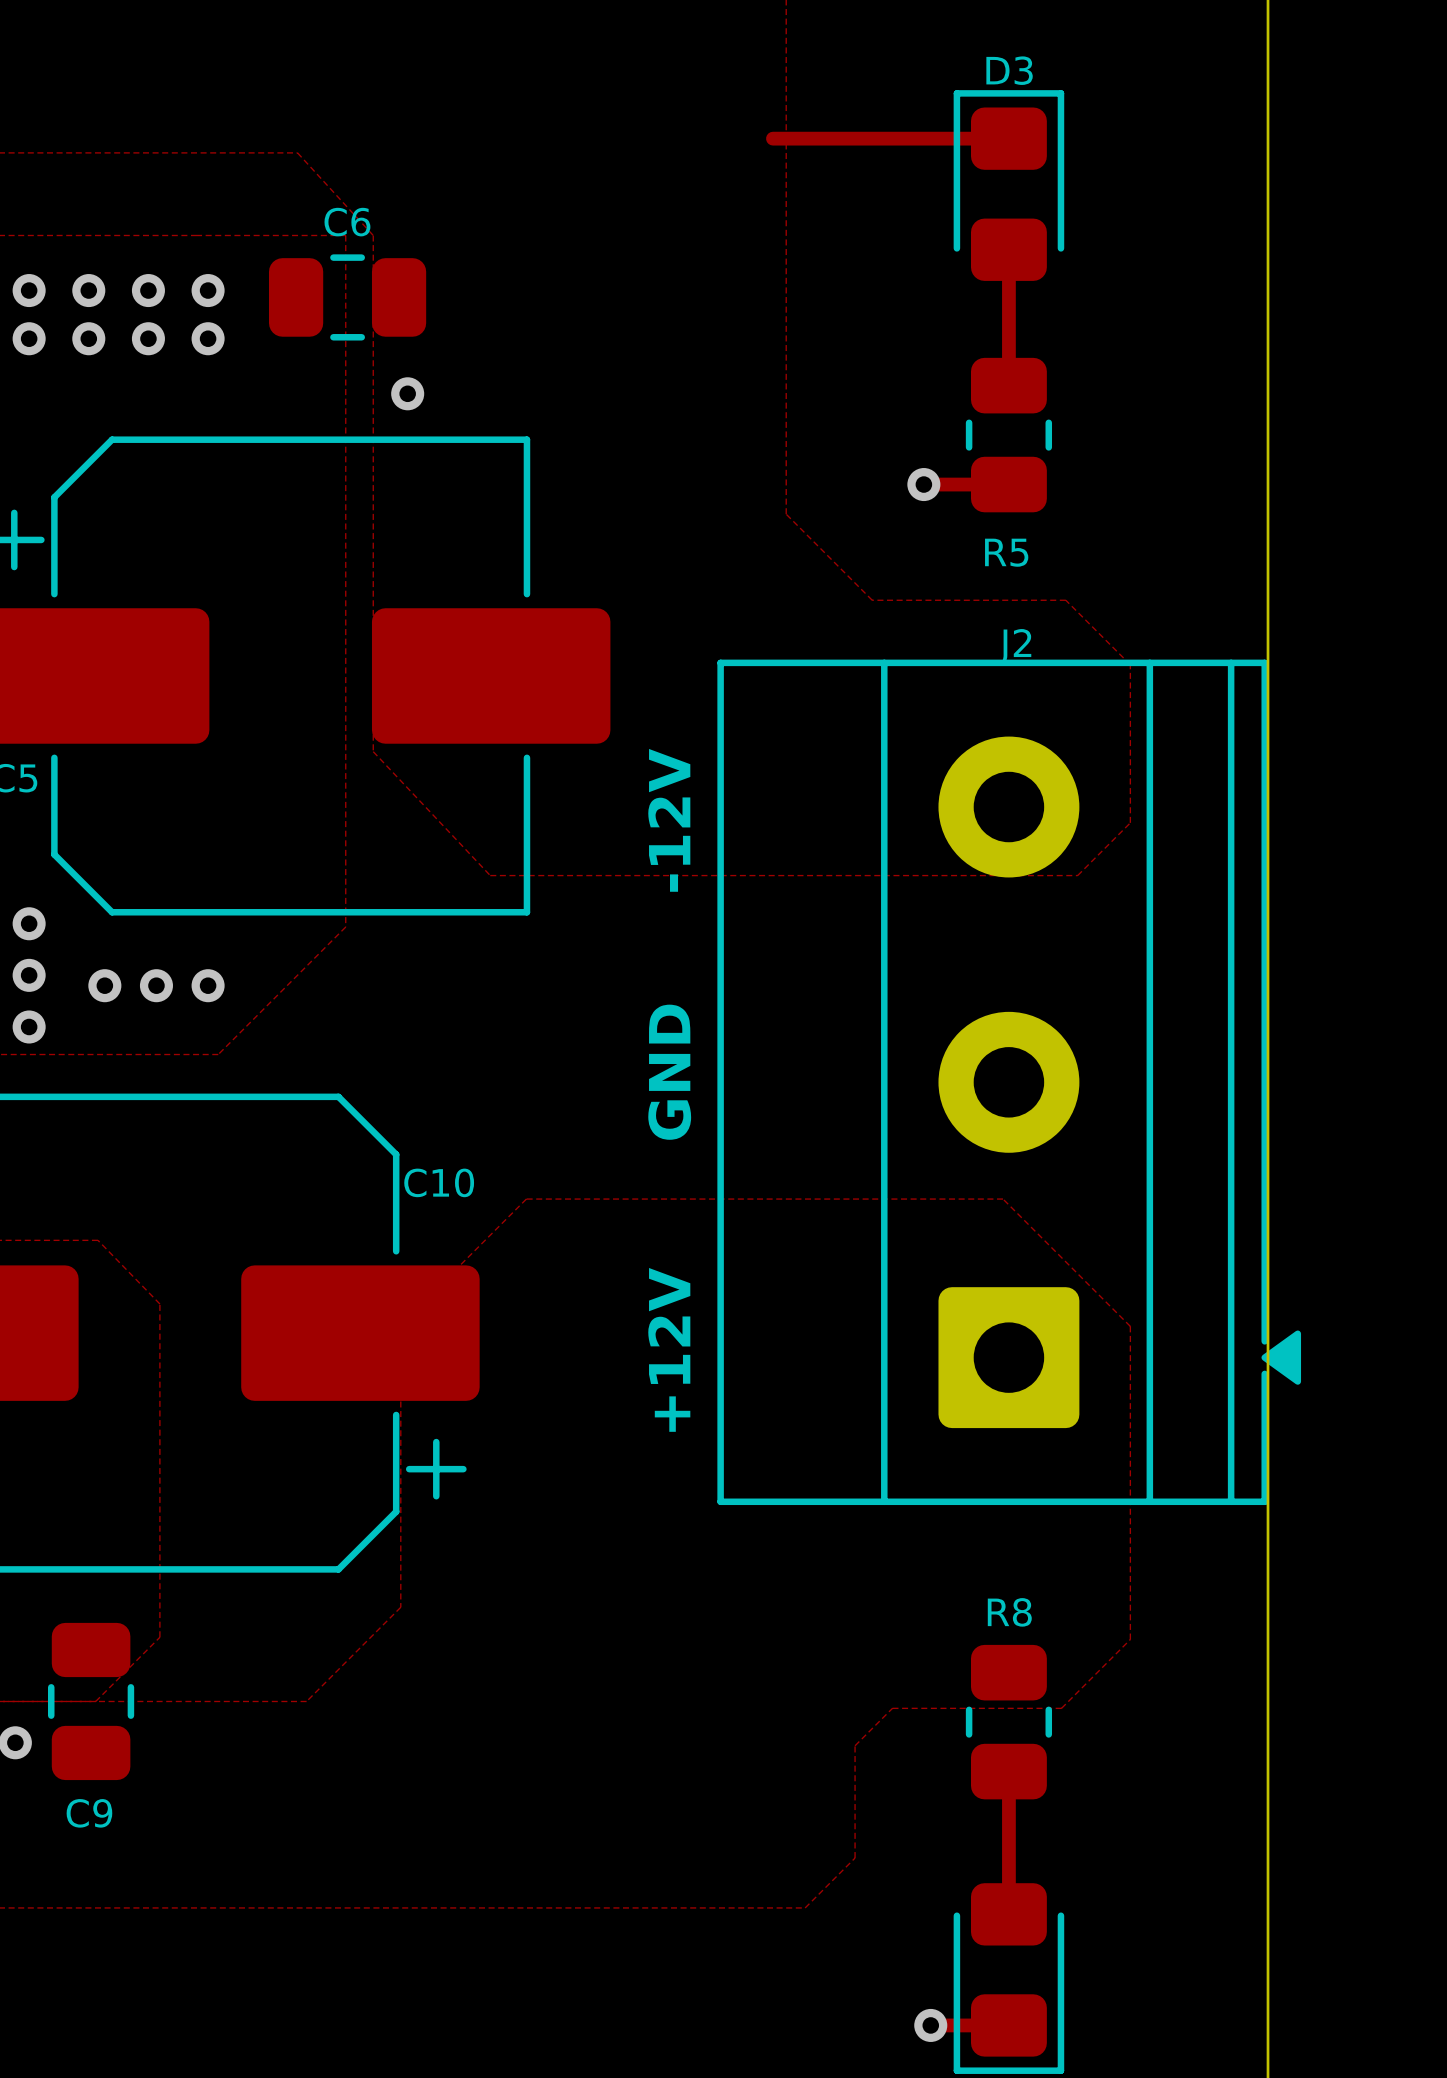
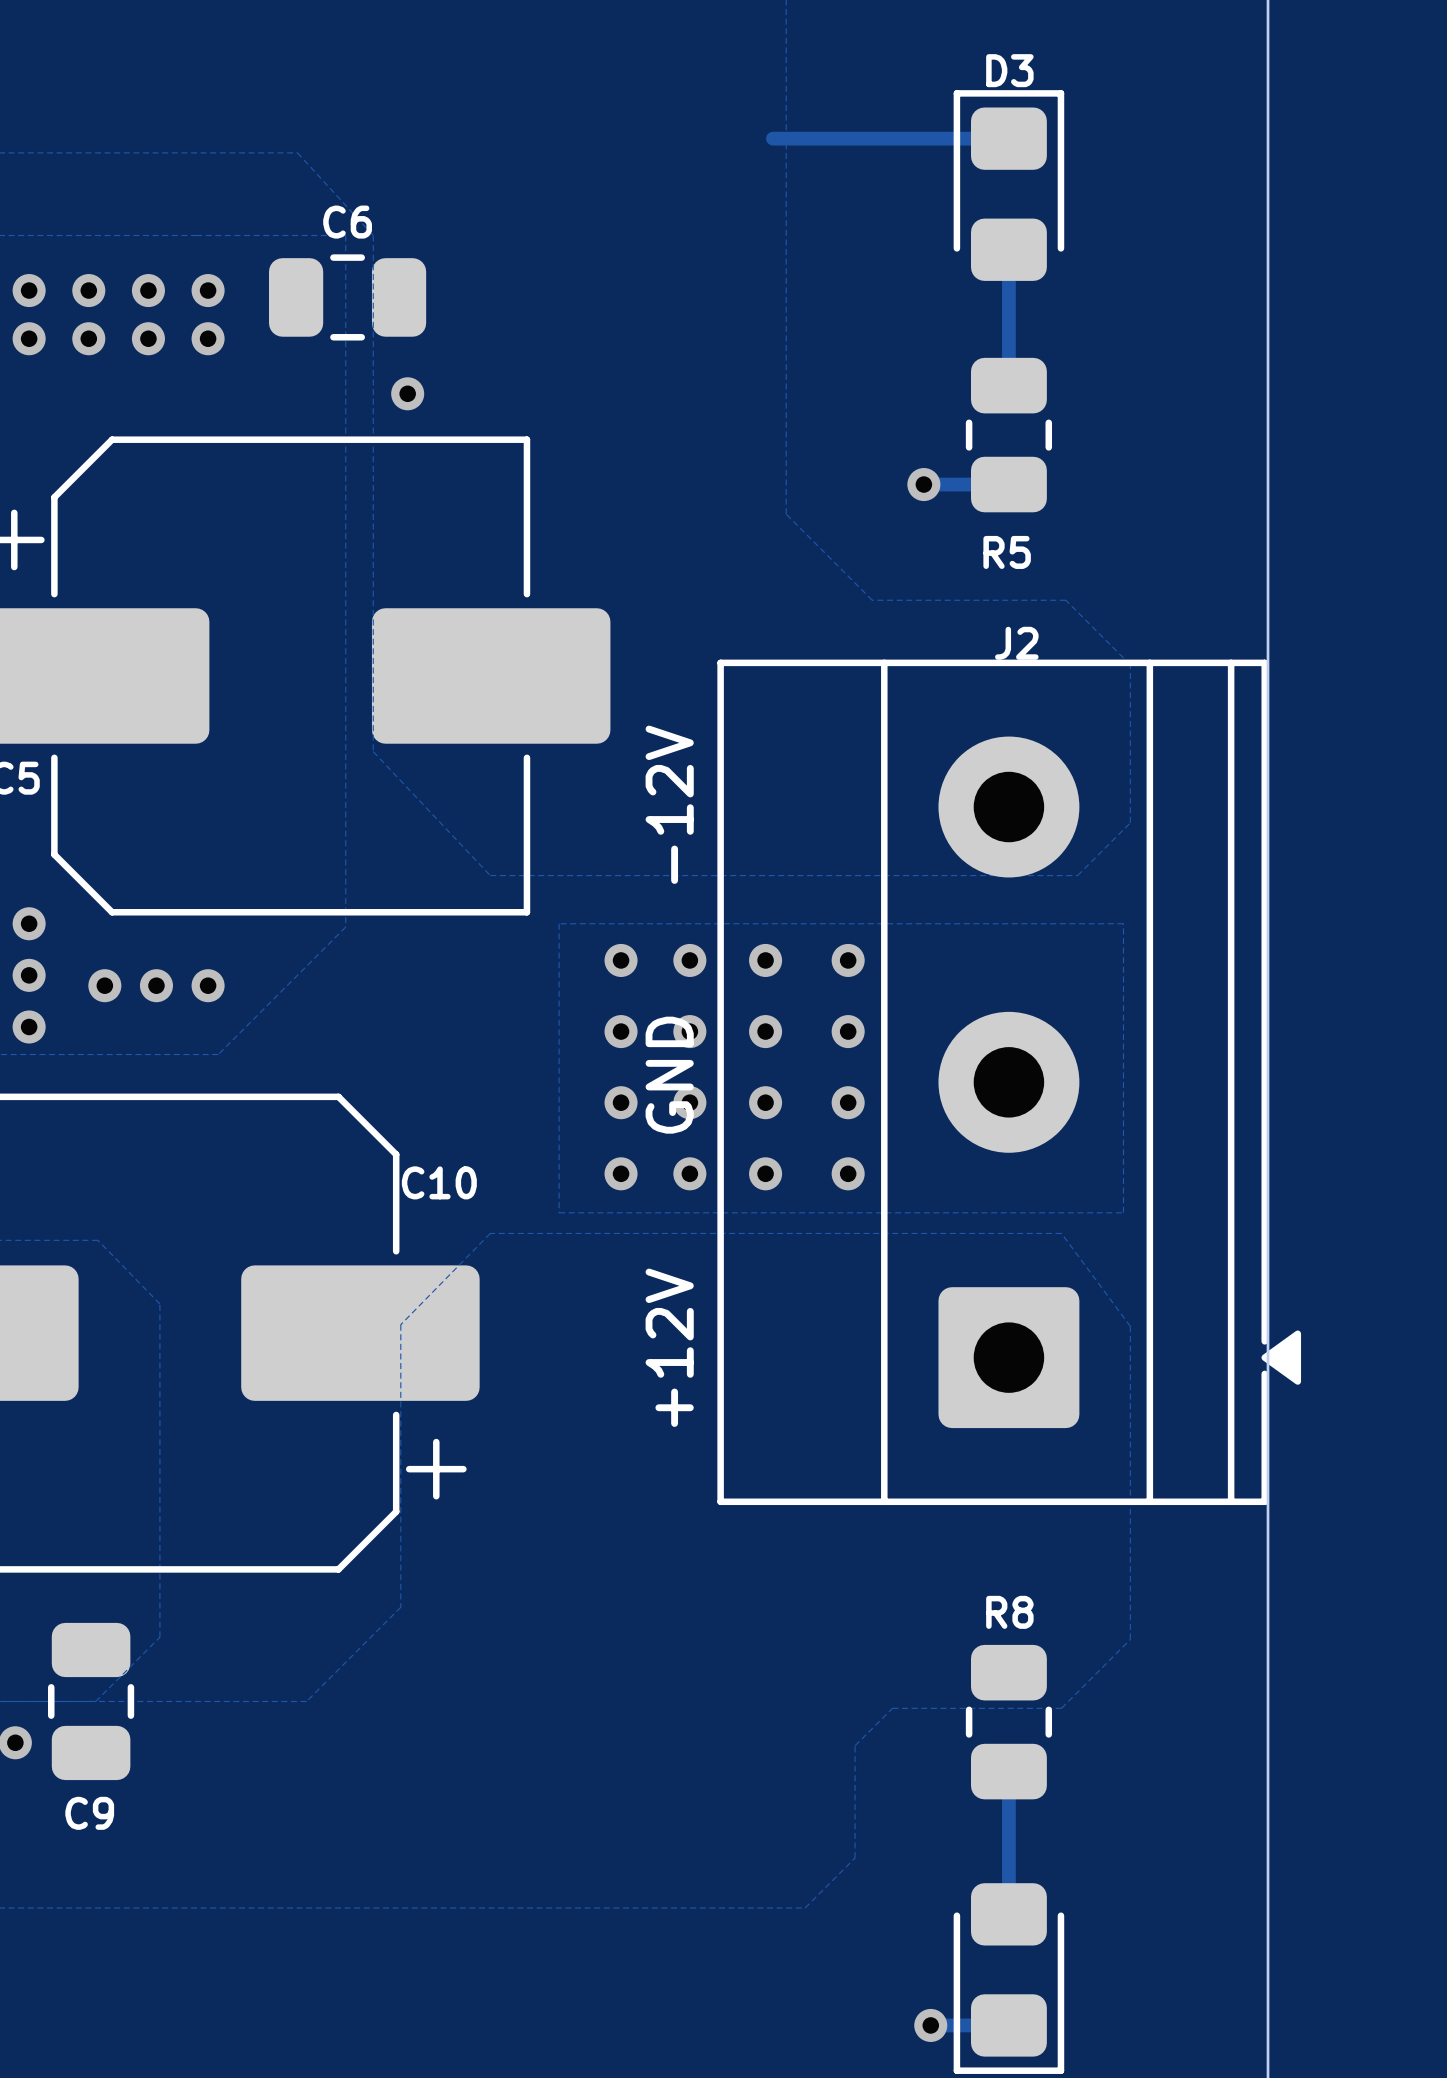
zone outline: none -> (559, 923) (1123, 923) (1123, 1212) (559, 1212) (559, 923)
via: none -> (621, 960)
via: none -> (689, 960)
via: none -> (765, 960)
via: none -> (848, 960)
via: none -> (621, 1031)
via: none -> (689, 1031)
via: none -> (765, 1031)
via: none -> (848, 1031)
via: none -> (621, 1102)
via: none -> (689, 1102)
via: none -> (765, 1102)
via: none -> (848, 1102)
via: none -> (621, 1173)
via: none -> (689, 1173)
via: none -> (765, 1173)
via: none -> (848, 1173)
zone outline: (400, 1324) (526, 1199) (1003, 1199) (1130, 1326) -> (400, 1324) (490, 1233) (1061, 1233) (1130, 1326)

